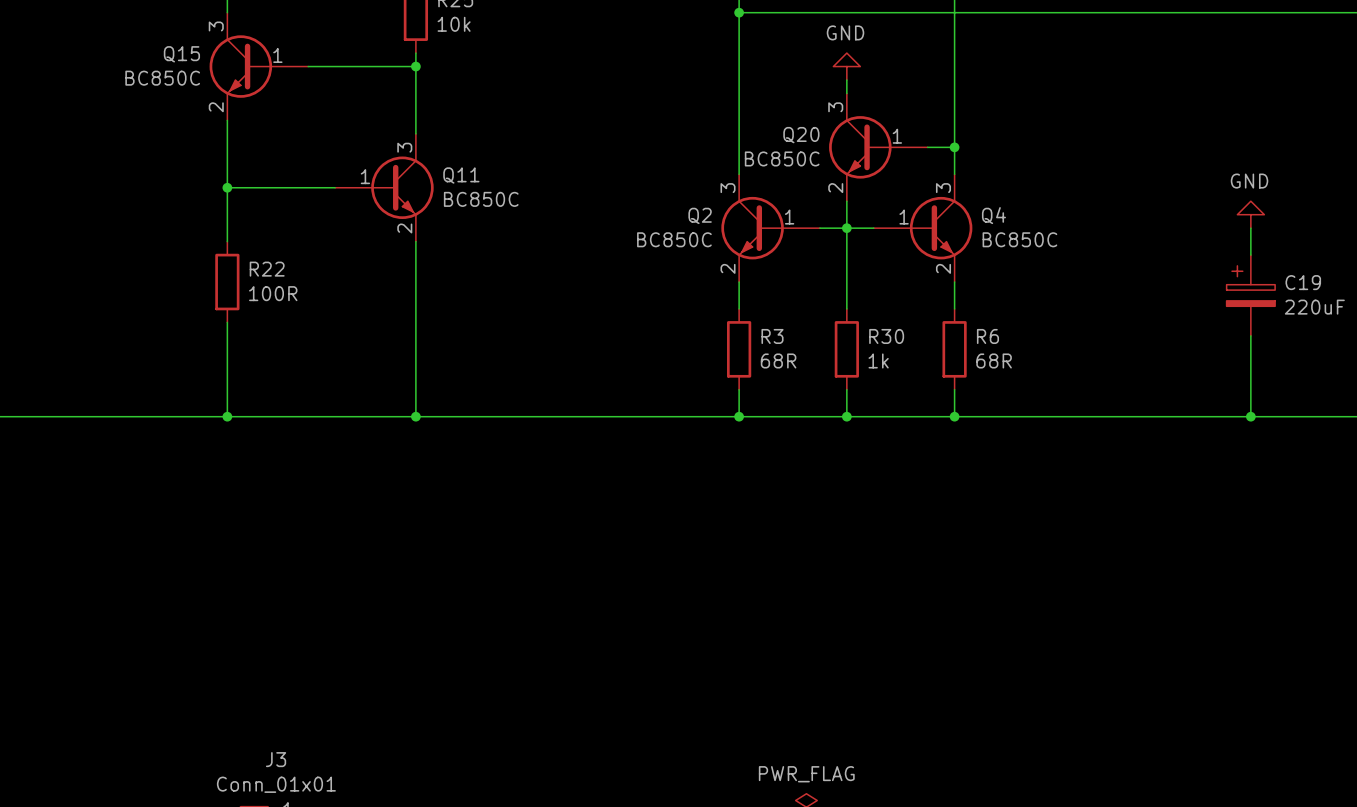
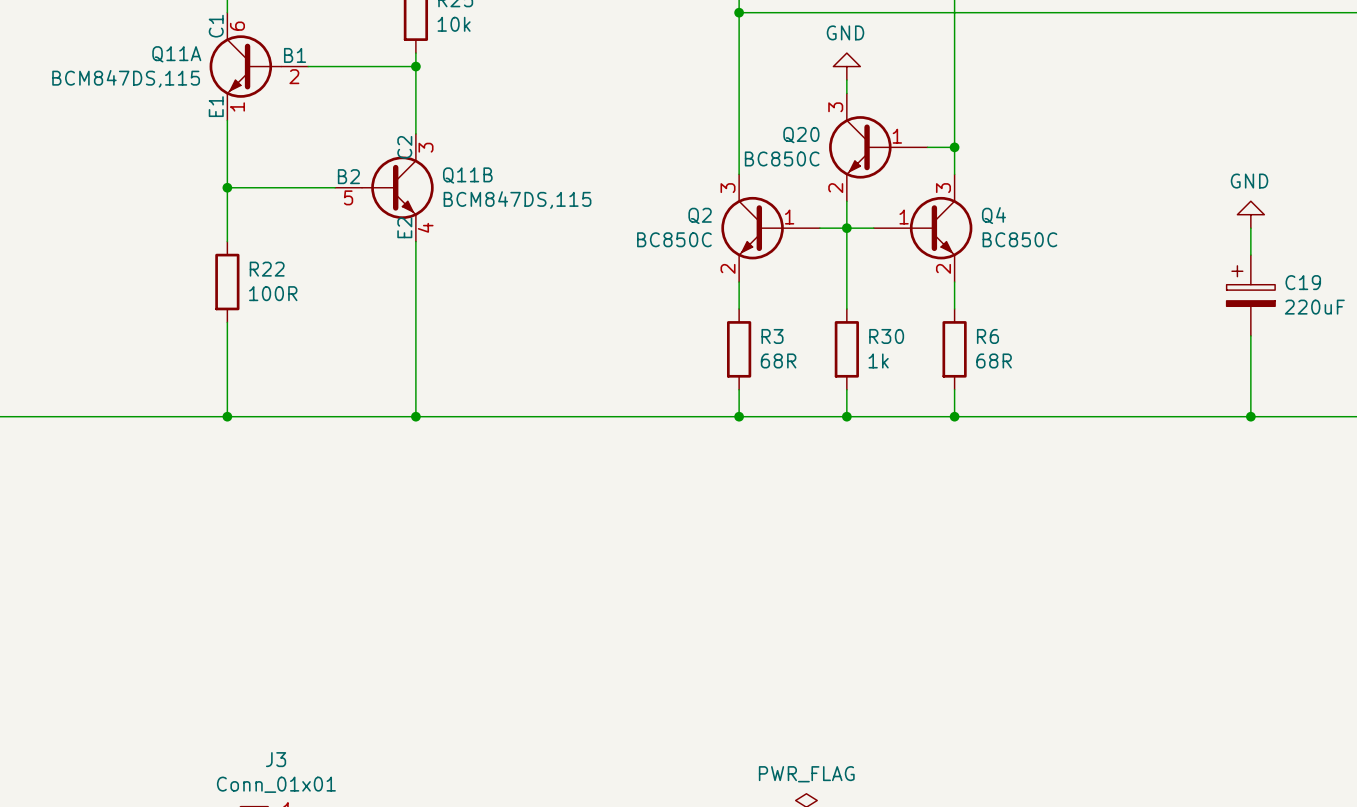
Q15: BC850C (258, 66) -> none
Q11A: none -> BCM847DS,115 (258, 66)
Q11: BC850C (384, 187) -> none
Q11B: none -> BCM847DS,115 (384, 187)

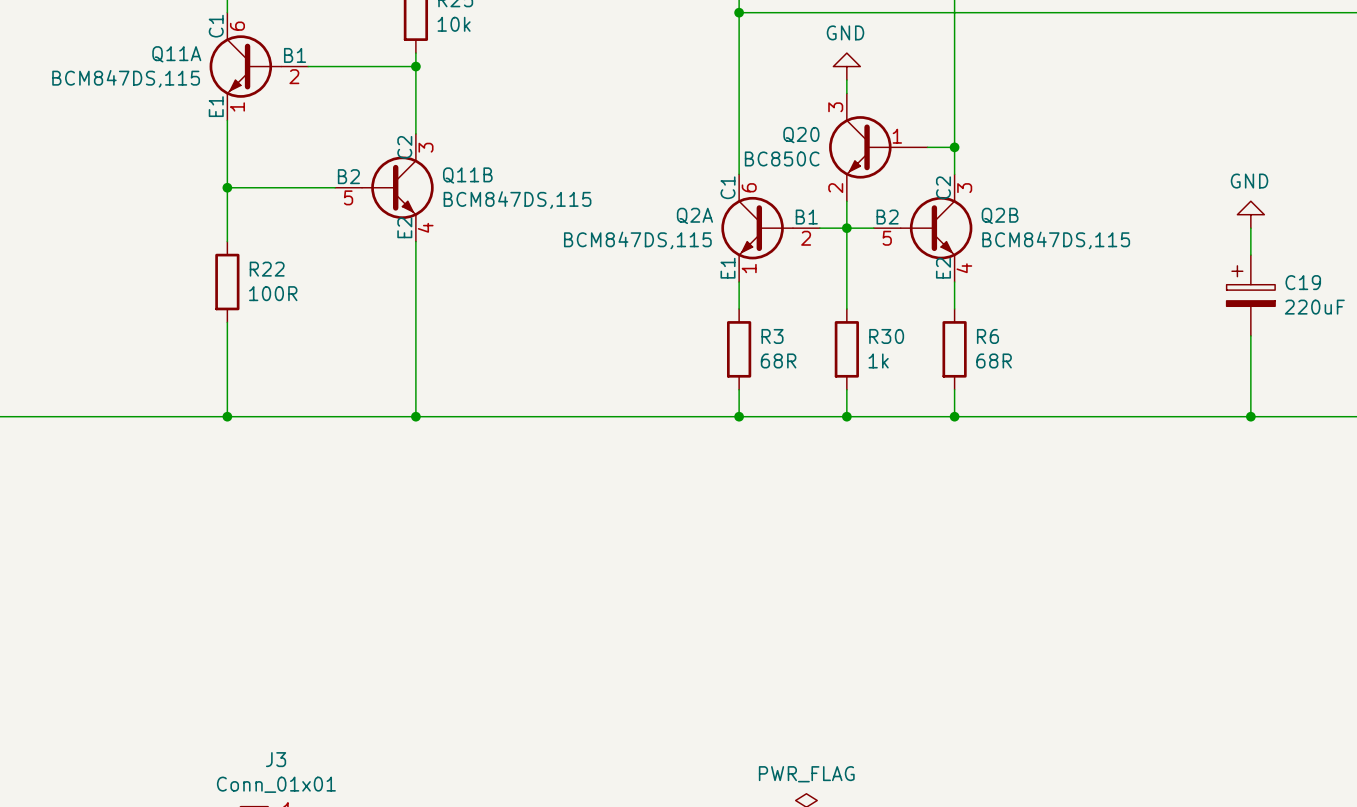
Q2: BC850C (770, 228) -> none
Q2A: none -> BCM847DS,115 (770, 228)
Q4: BC850C (923, 228) -> none
Q2B: none -> BCM847DS,115 (923, 228)

